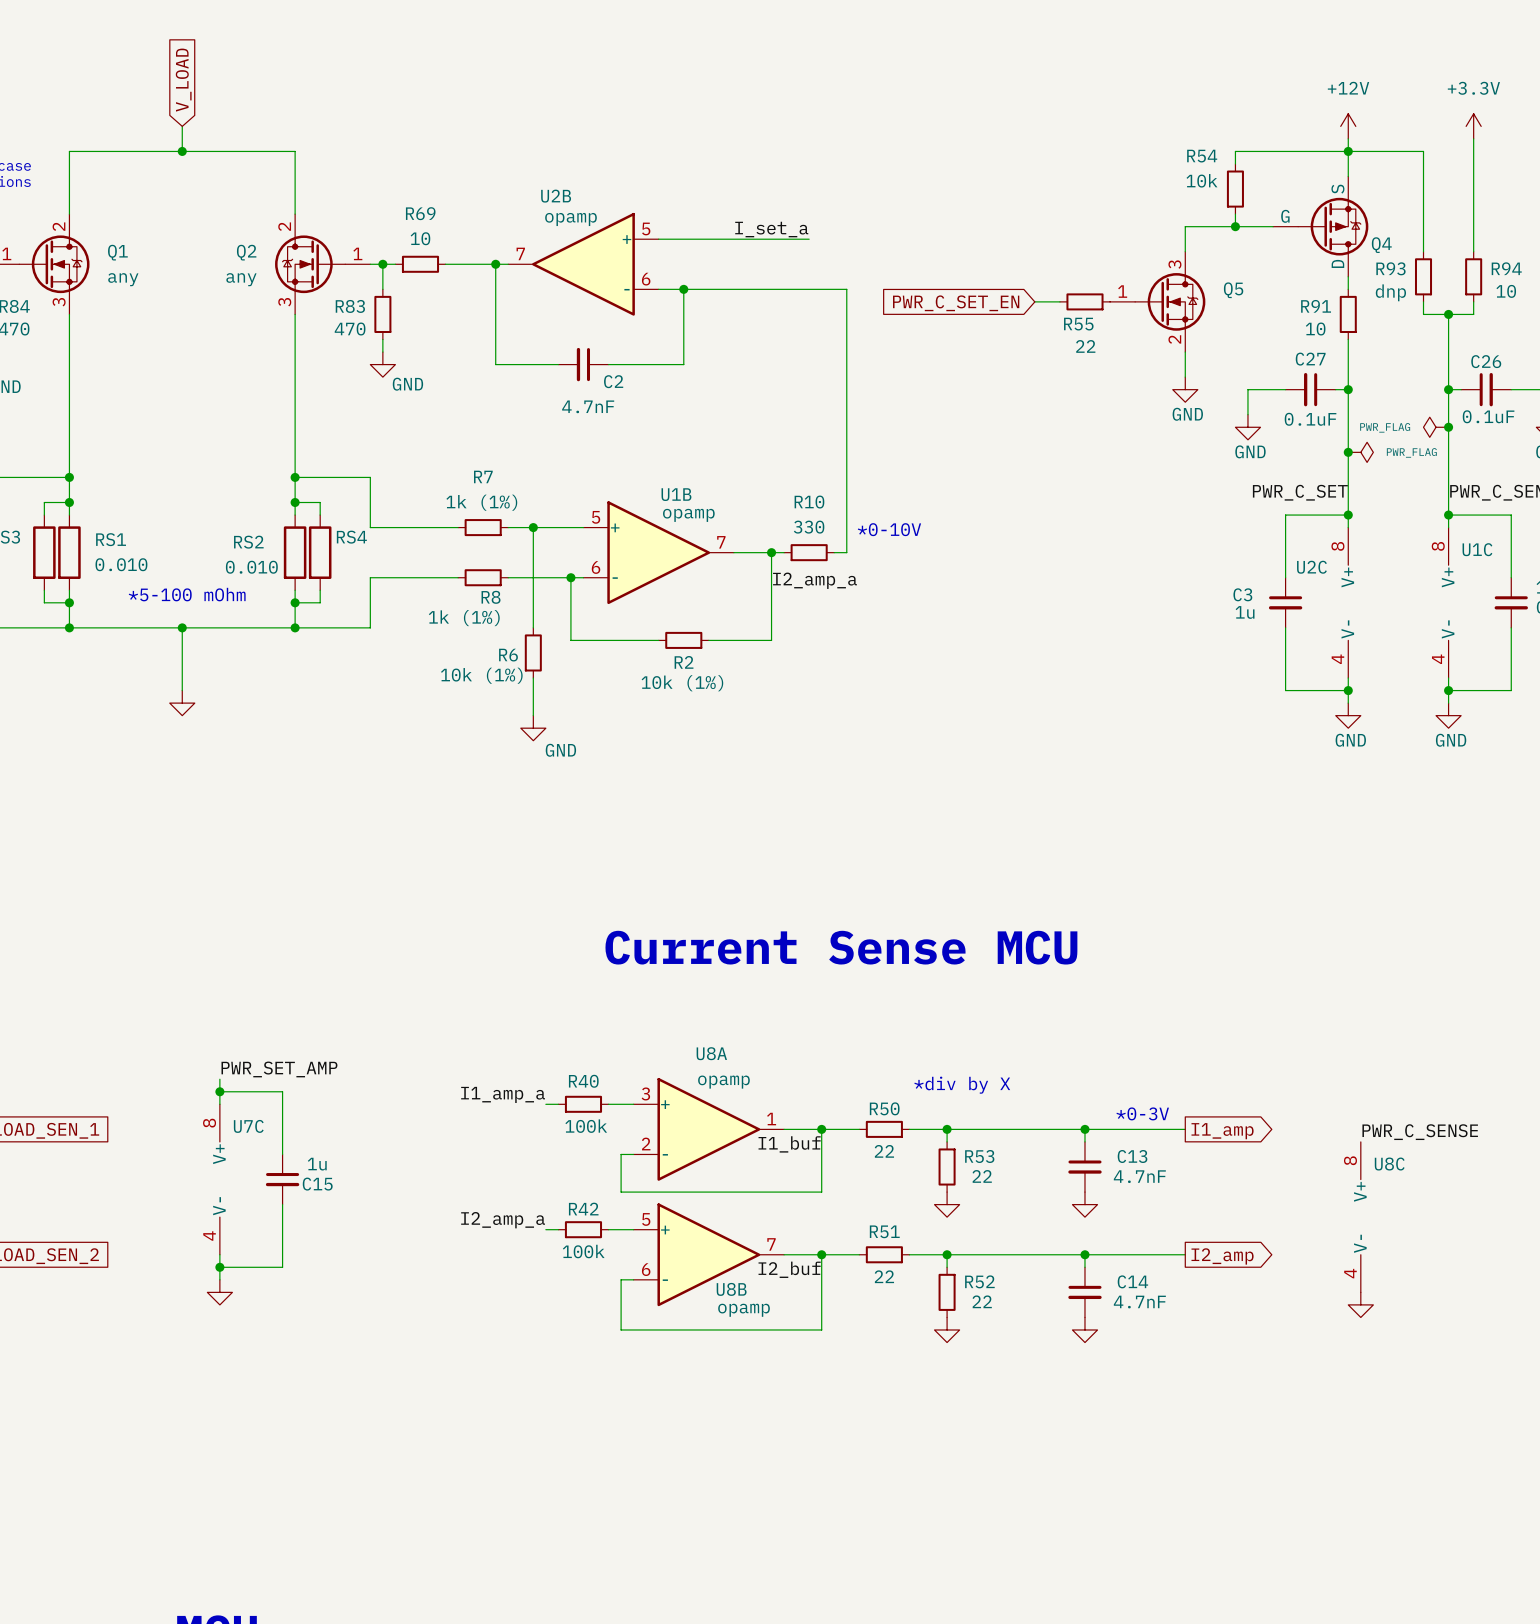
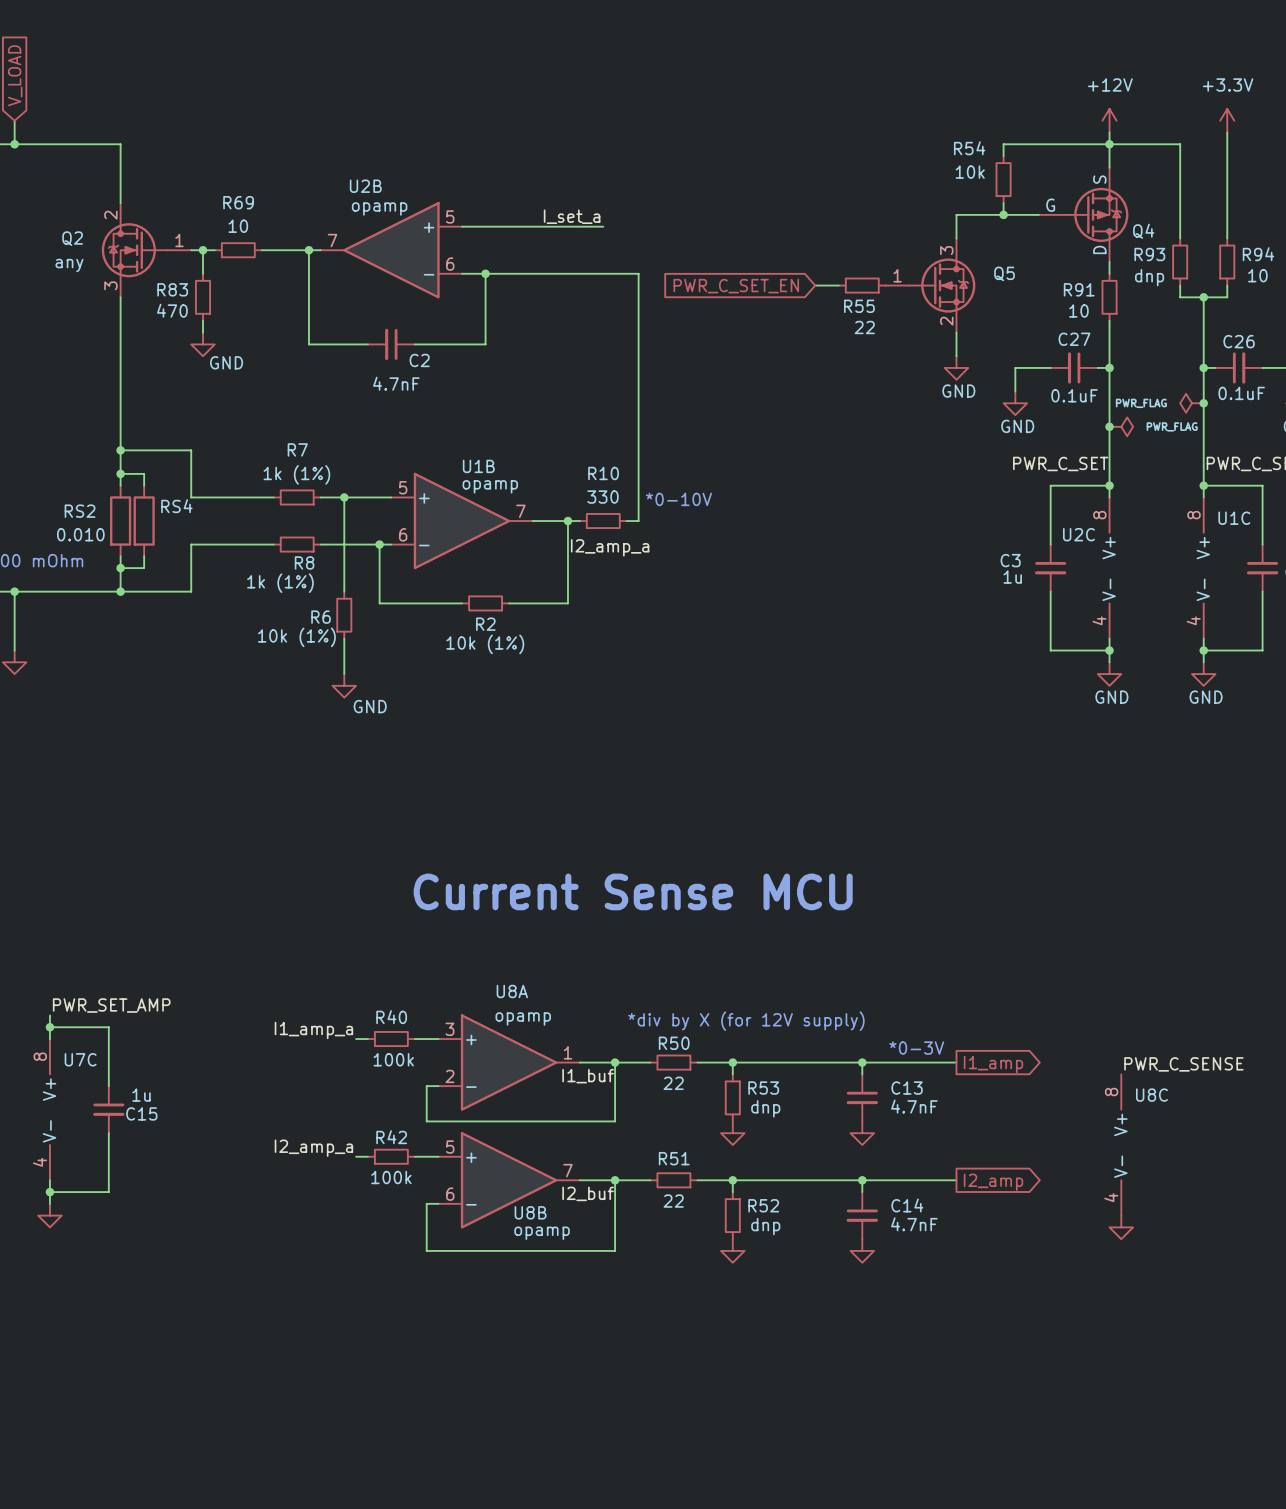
text: *div by X (962, 1085) -> *div by X (for 12V supply) (746, 1021)
R53 value: 22 (982, 1176) -> dnp (765, 1108)
R52 value: 22 (982, 1301) -> dnp (765, 1226)

